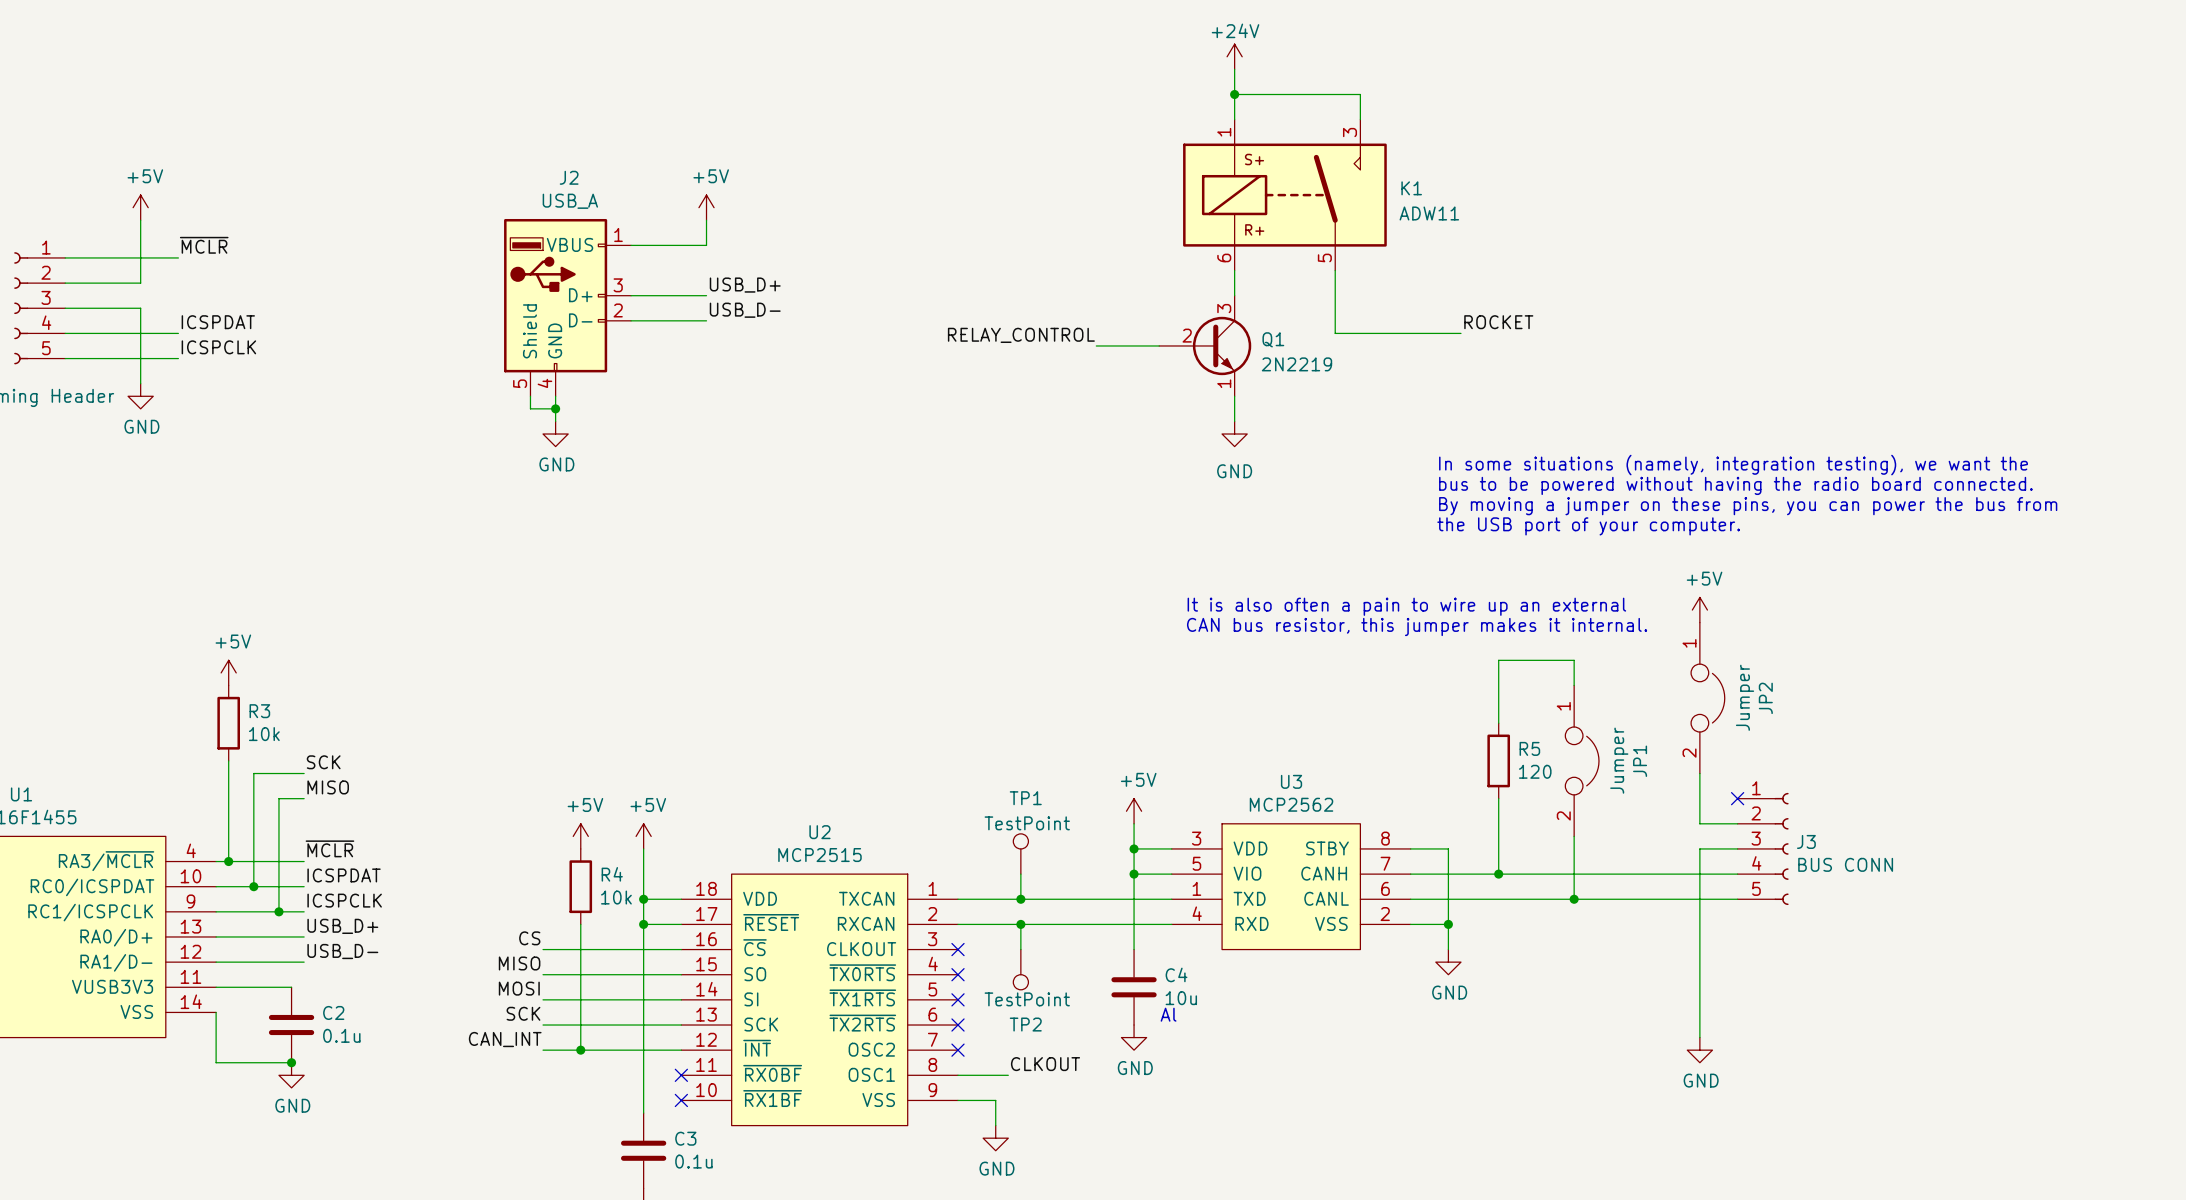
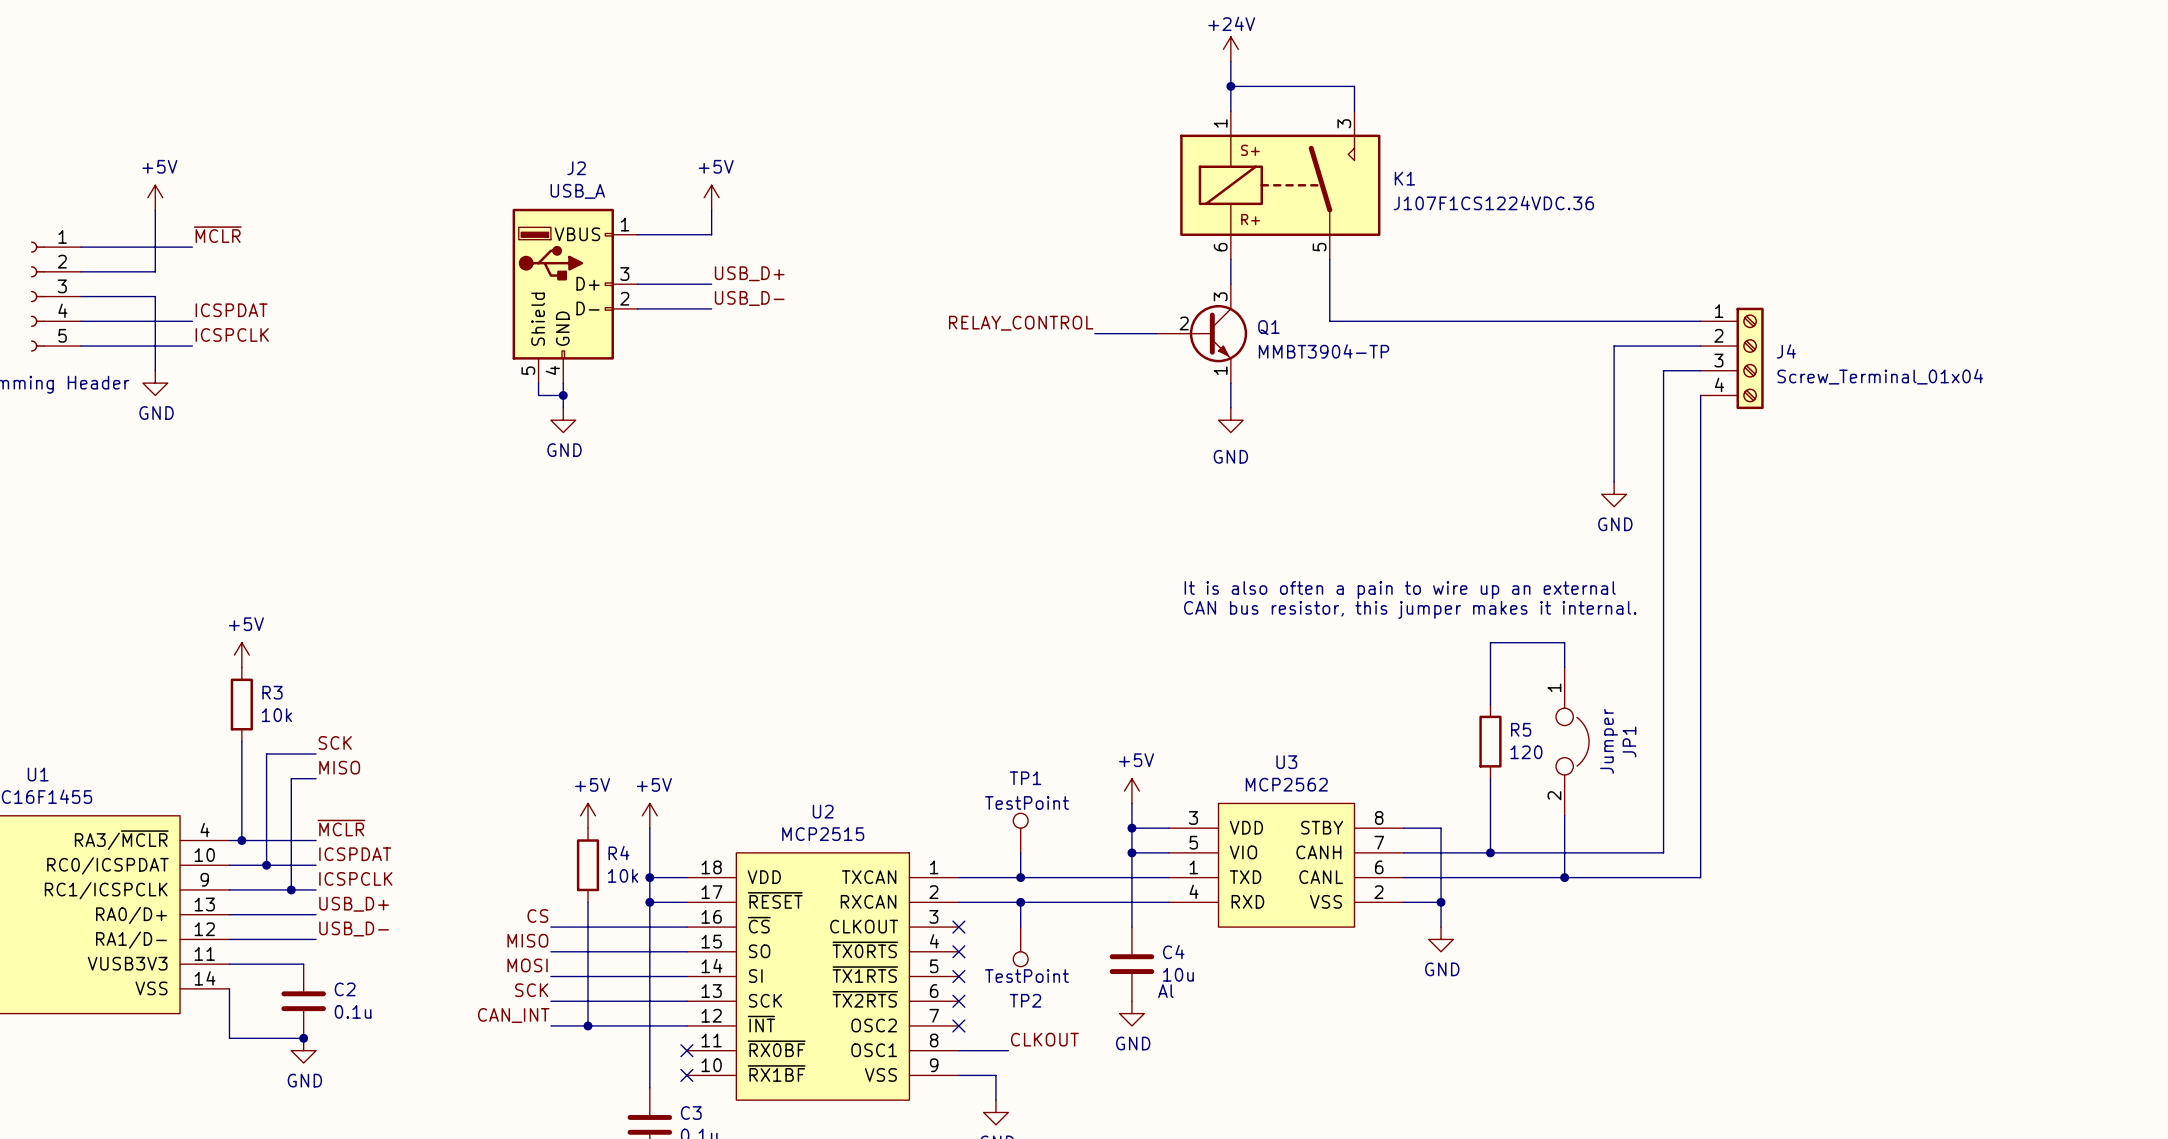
K1 value: ADW11 (1429, 213) -> J107F1CS1224VDC.36 (1493, 203)
label: ROCKET (1498, 322) -> none
wire: none -> (1453, 321) (1700, 321)
wire: none -> (1700, 346) (1614, 346) (1614, 482)
Q1 value: 2N2219 (1297, 364) -> MMBT3904-TP (1323, 351)
J4: none -> Screw_Terminal_01x04 (1732, 358)
text: In some situations (namely, integration testing), we want the (1733, 465) -> none
text: bus to be powered without having the radio board connected. (1735, 485) -> none
text: By moving a jumper on these pins, you can power the bus from (1748, 506) -> none
power symbol: none -> GND (1614, 494)
text: the USB port of your computer. (1588, 526) -> none
power symbol: +5V (1699, 610) -> none
JP2: Jumper (1707, 698) -> none
wire: (1699, 773) (1699, 823) (1737, 823) -> none
no-connect mark: (1737, 798) -> none
wire: (1737, 848) (1699, 848) (1699, 1037) -> none
J3: BUS CONN (1763, 848) -> none
wire: (1674, 874) (1737, 874) -> (1663, 852) (1663, 370) (1700, 370)
wire: (1712, 899) (1737, 899) -> (1700, 877) (1700, 395)
power symbol: GND (1699, 1050) -> none

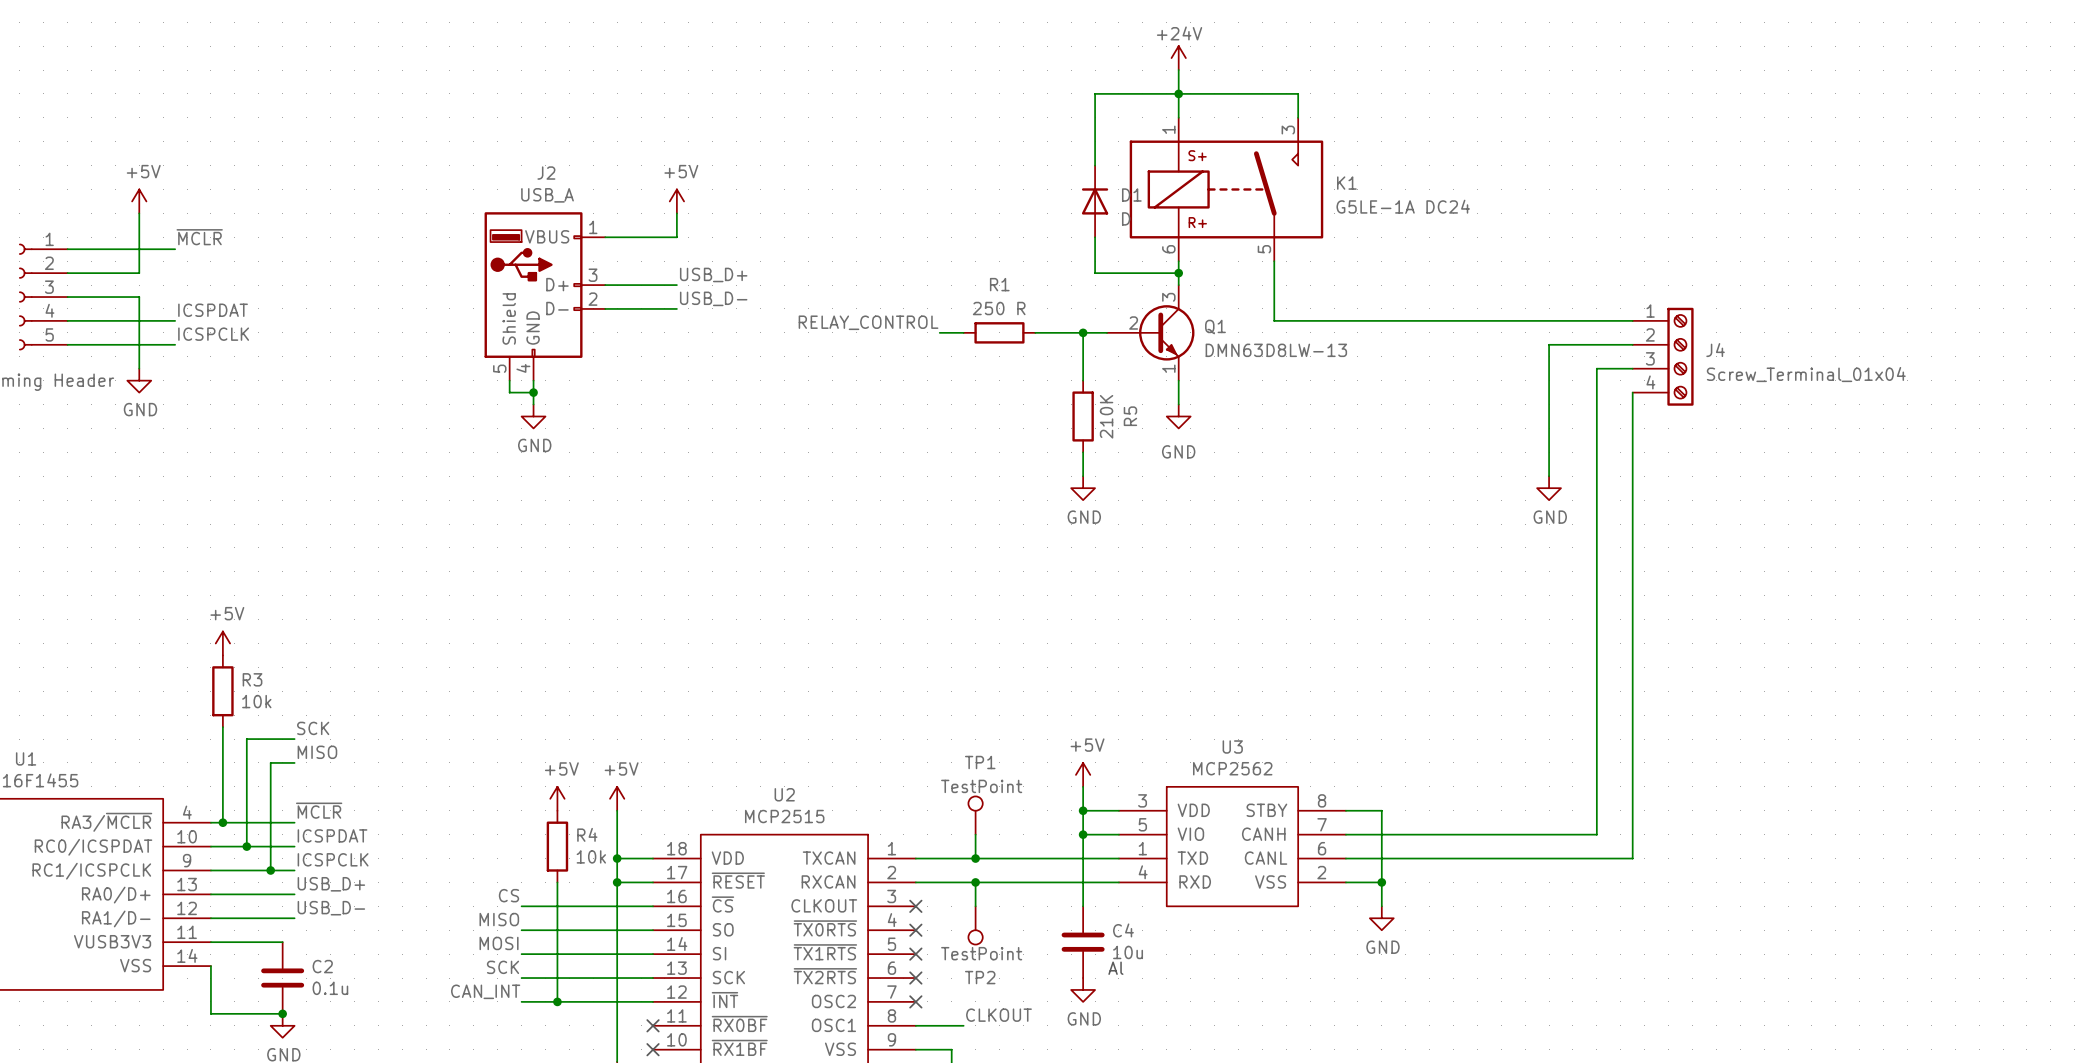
wire: none -> (1178, 93) (1095, 93) (1095, 165)
D1: none -> D (1095, 201)
K1 value: J107F1CS1224VDC.36 (1493, 203) -> G5LE-1A DC24 (1403, 206)
wire: none -> (1095, 237) (1095, 273) (1178, 273)
junction: none -> (1178, 273)
label position: RELAY_CONTROL (1021, 323) -> RELAY_CONTROL (868, 322)
wire: none -> (939, 332) (963, 332)
R1: none -> 250 R (999, 332)
wire: none -> (1035, 332) (1047, 332)
wire: none -> (1083, 332) (1083, 380)
junction: none -> (1083, 332)
Q1 value: MMBT3904-TP (1323, 351) -> DMN63D8LW-13 (1276, 350)
wire: none -> (1083, 452) (1083, 476)
power symbol: none -> GND (1083, 488)
text: It is also often a pain to wire up an external (1400, 590) -> none
text: CAN bus resistor, this jumper makes it internal. (1410, 609) -> none
wire: (1564, 667) (1564, 642) (1490, 642) (1490, 704) -> none
R5 name rotation: 0° (1521, 729) -> 90° counterclockwise (1130, 416)
R5 position: (1490, 741) -> (1083, 416)
JP1: Jumper (1572, 741) -> none
R5 value: 120 (1526, 752) -> 210K (1106, 416)
wire: (1490, 778) (1490, 852) -> none
wire: (1564, 815) (1564, 877) -> none
junction: (1490, 852) -> none
junction: (1564, 877) -> none

